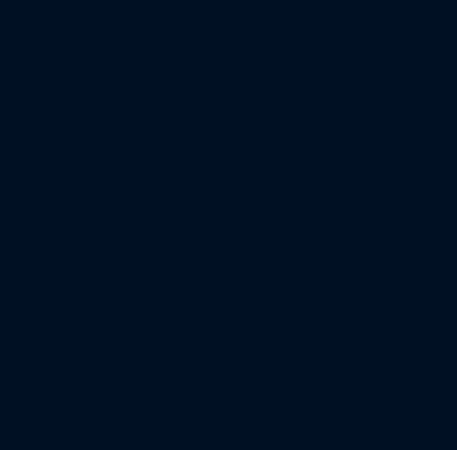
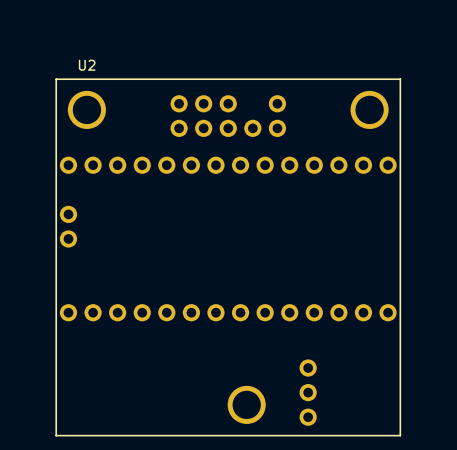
U2: none -> (228, 257)

